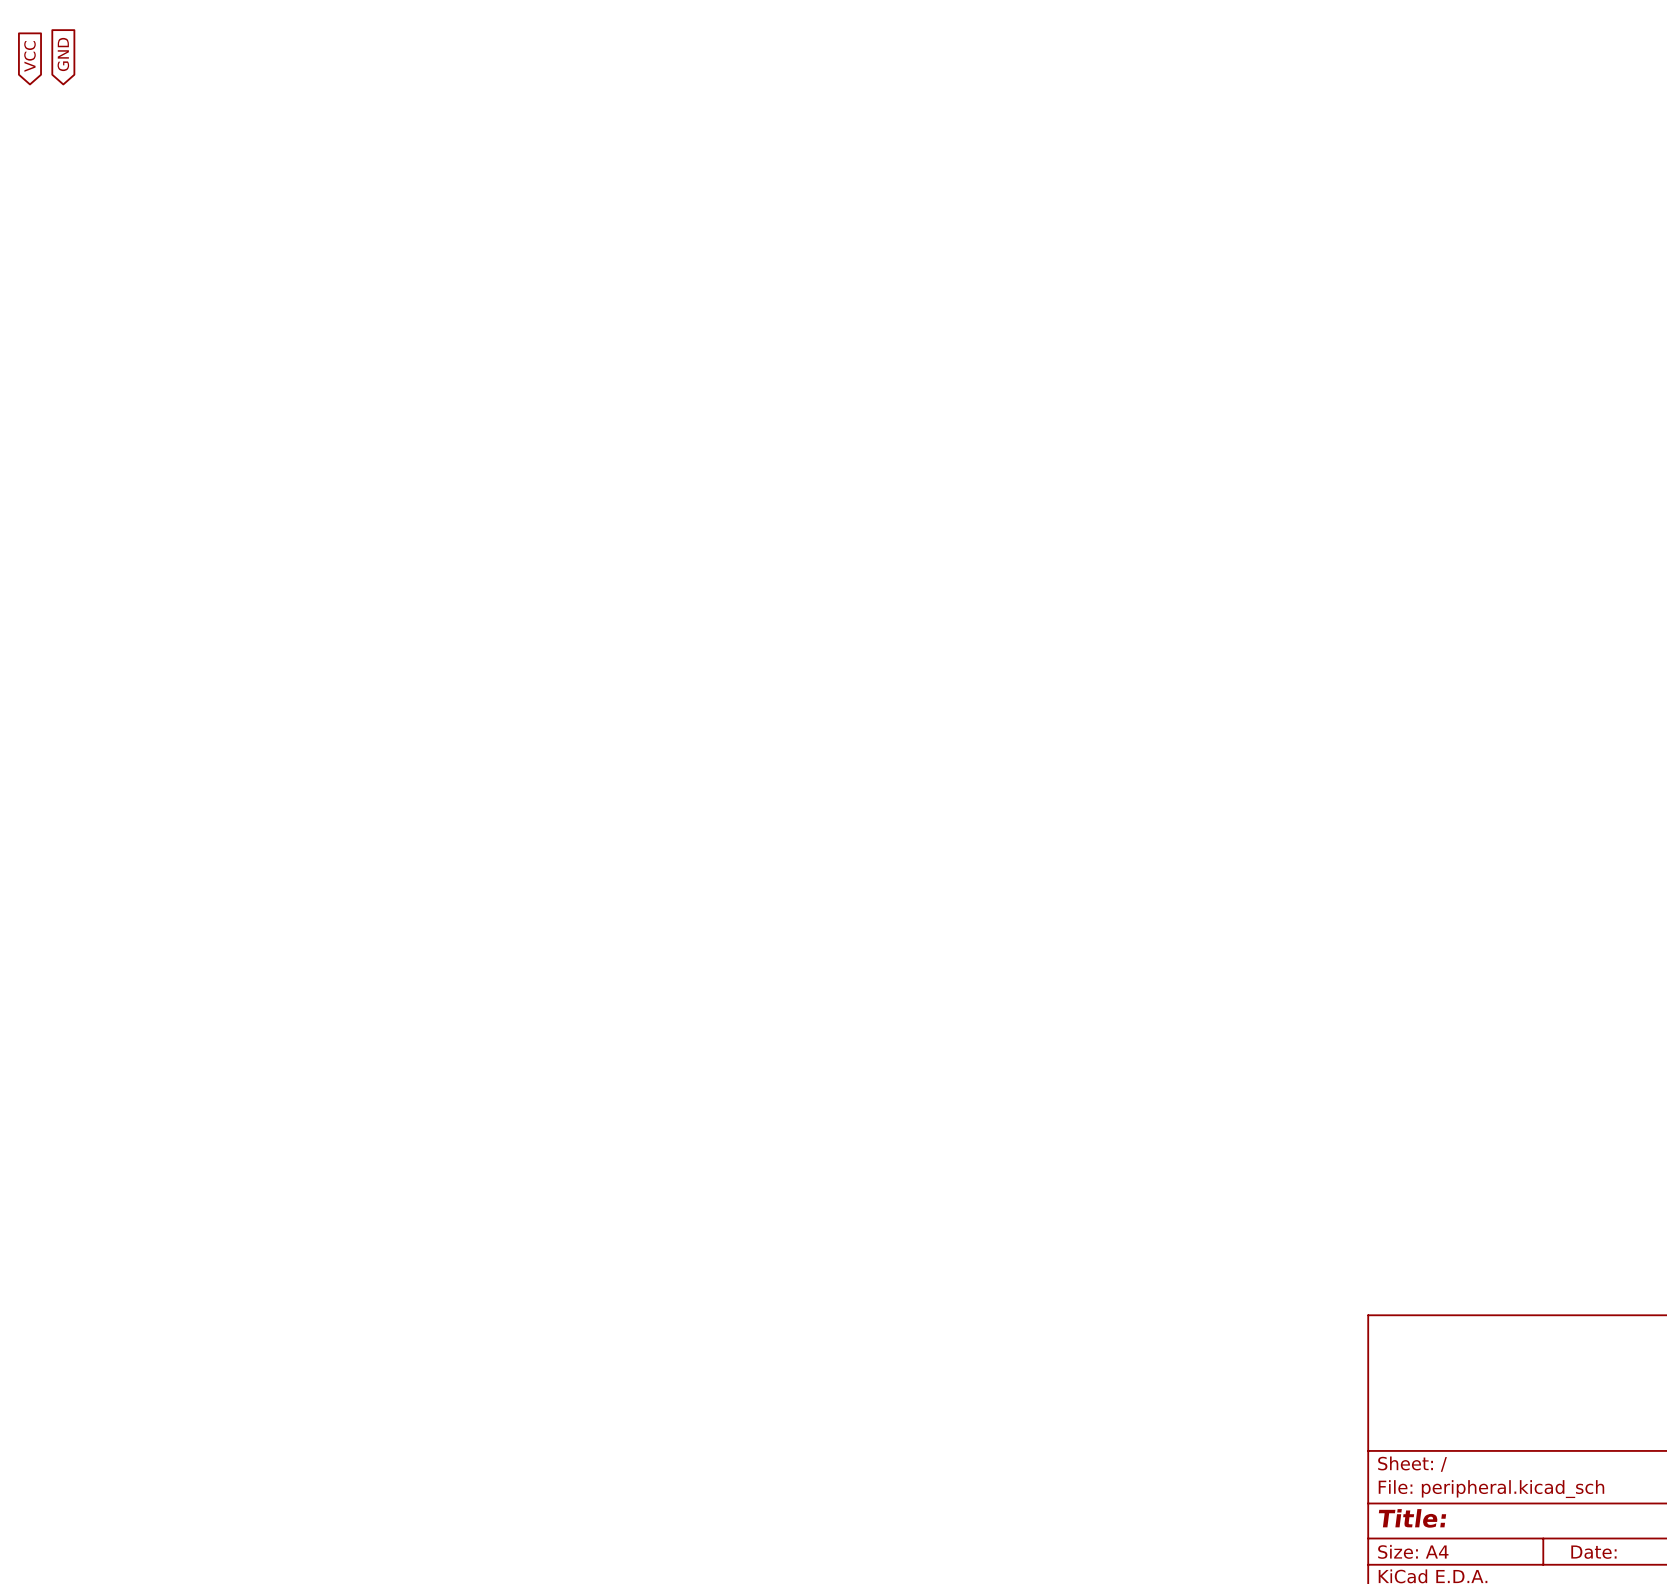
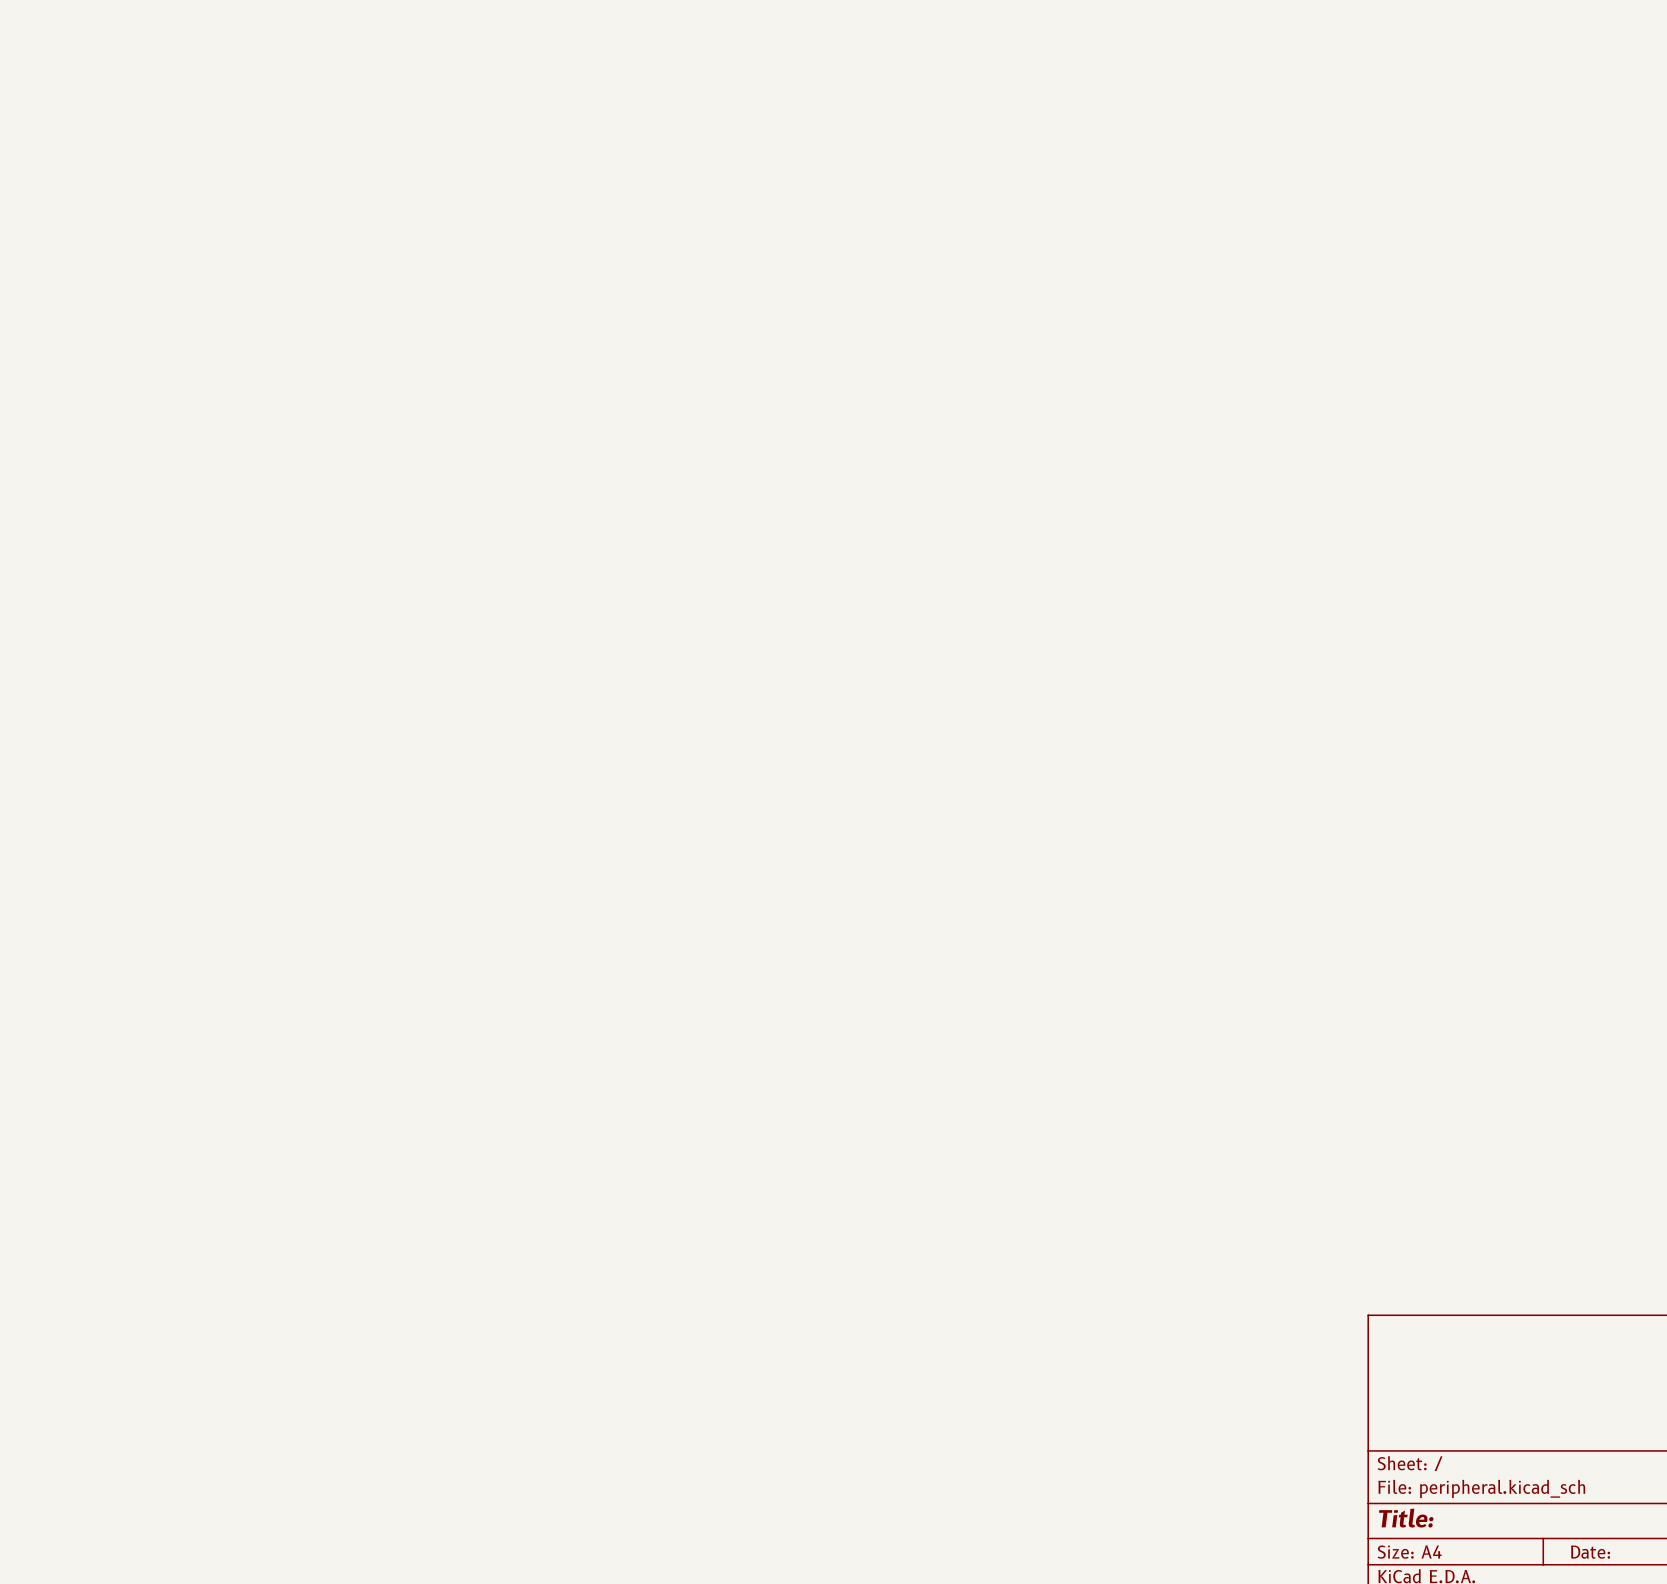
global label: GND (63, 54) -> none
global label: VCC (29, 56) -> none

